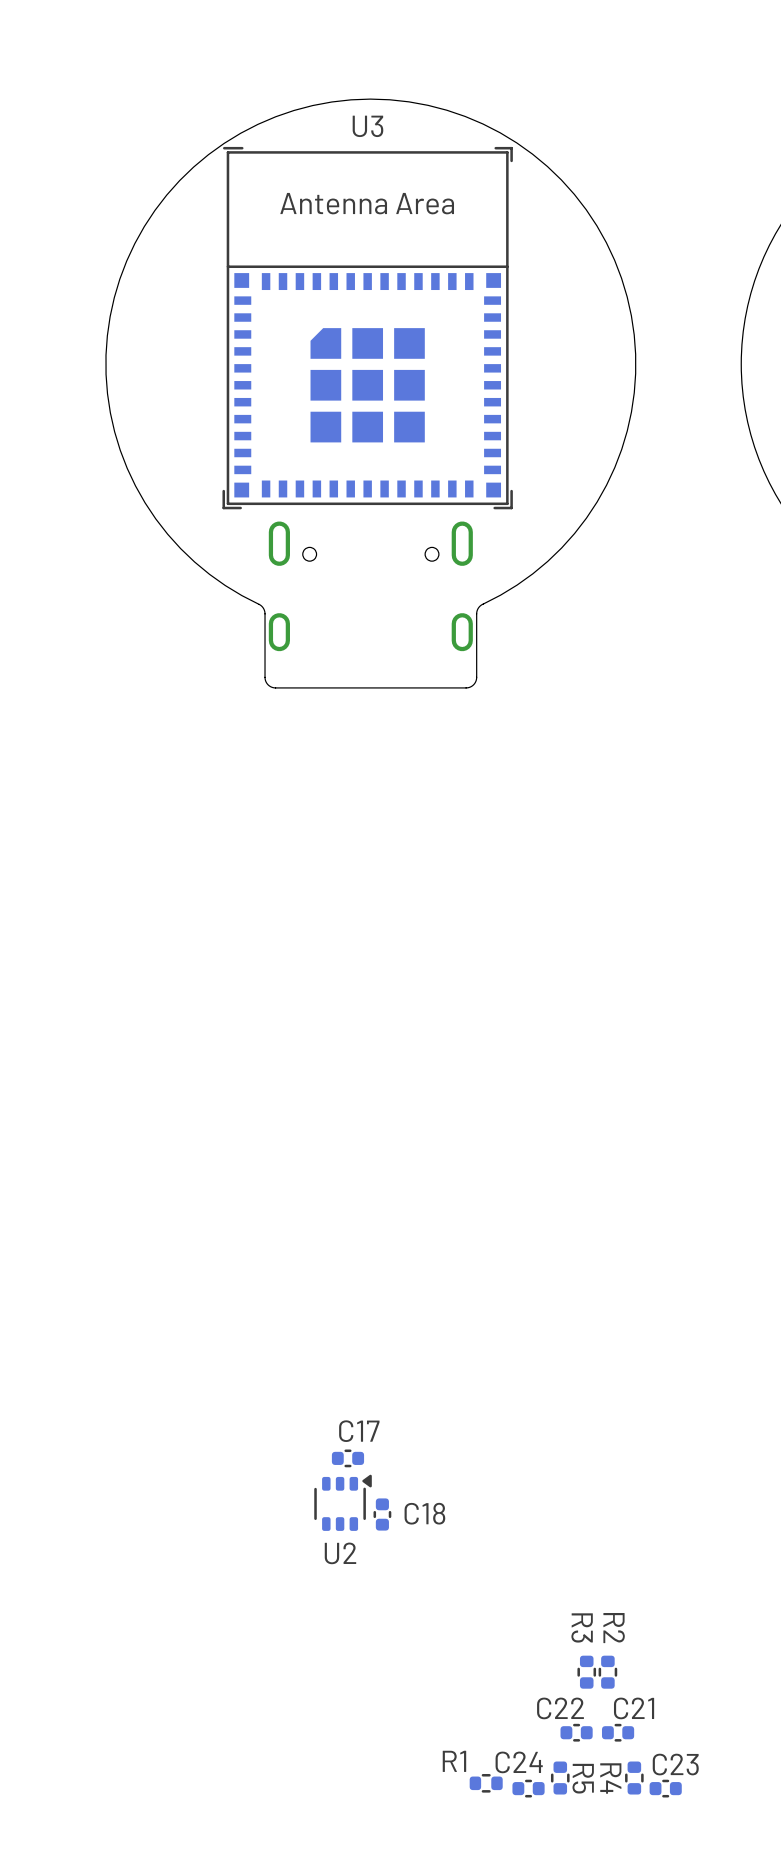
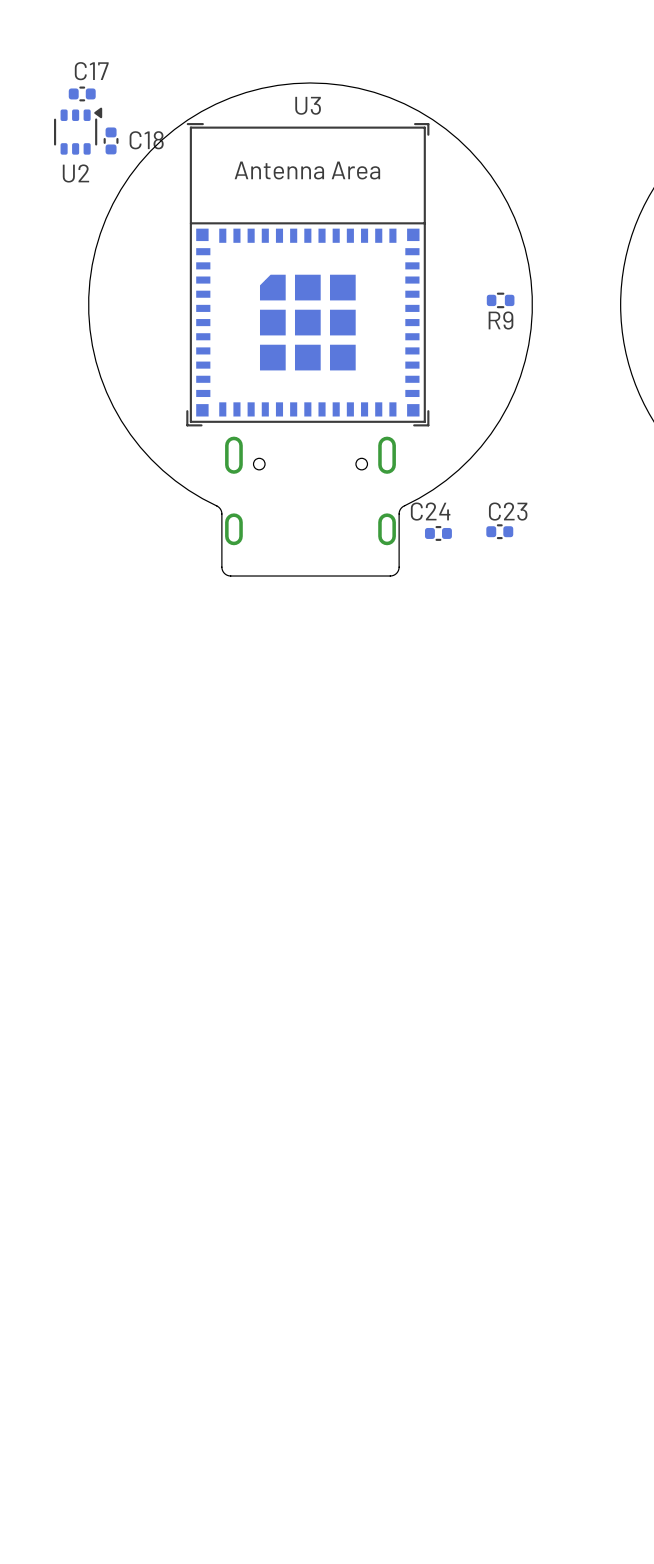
R9: none -> (500, 300)
C17 position: (347, 1458) -> (82, 93)
U2 position: (343, 1502) -> (78, 131)
C18 position: (382, 1514) -> (111, 140)
R3: (586, 1672) -> none
R2: (607, 1672) -> none
C22: (576, 1732) -> none
C21: (618, 1732) -> none
R5: (560, 1778) -> none
R4: (634, 1778) -> none
R1: (486, 1783) -> none
C24 position: (528, 1788) -> (438, 533)
C23 position: (665, 1788) -> (499, 531)

